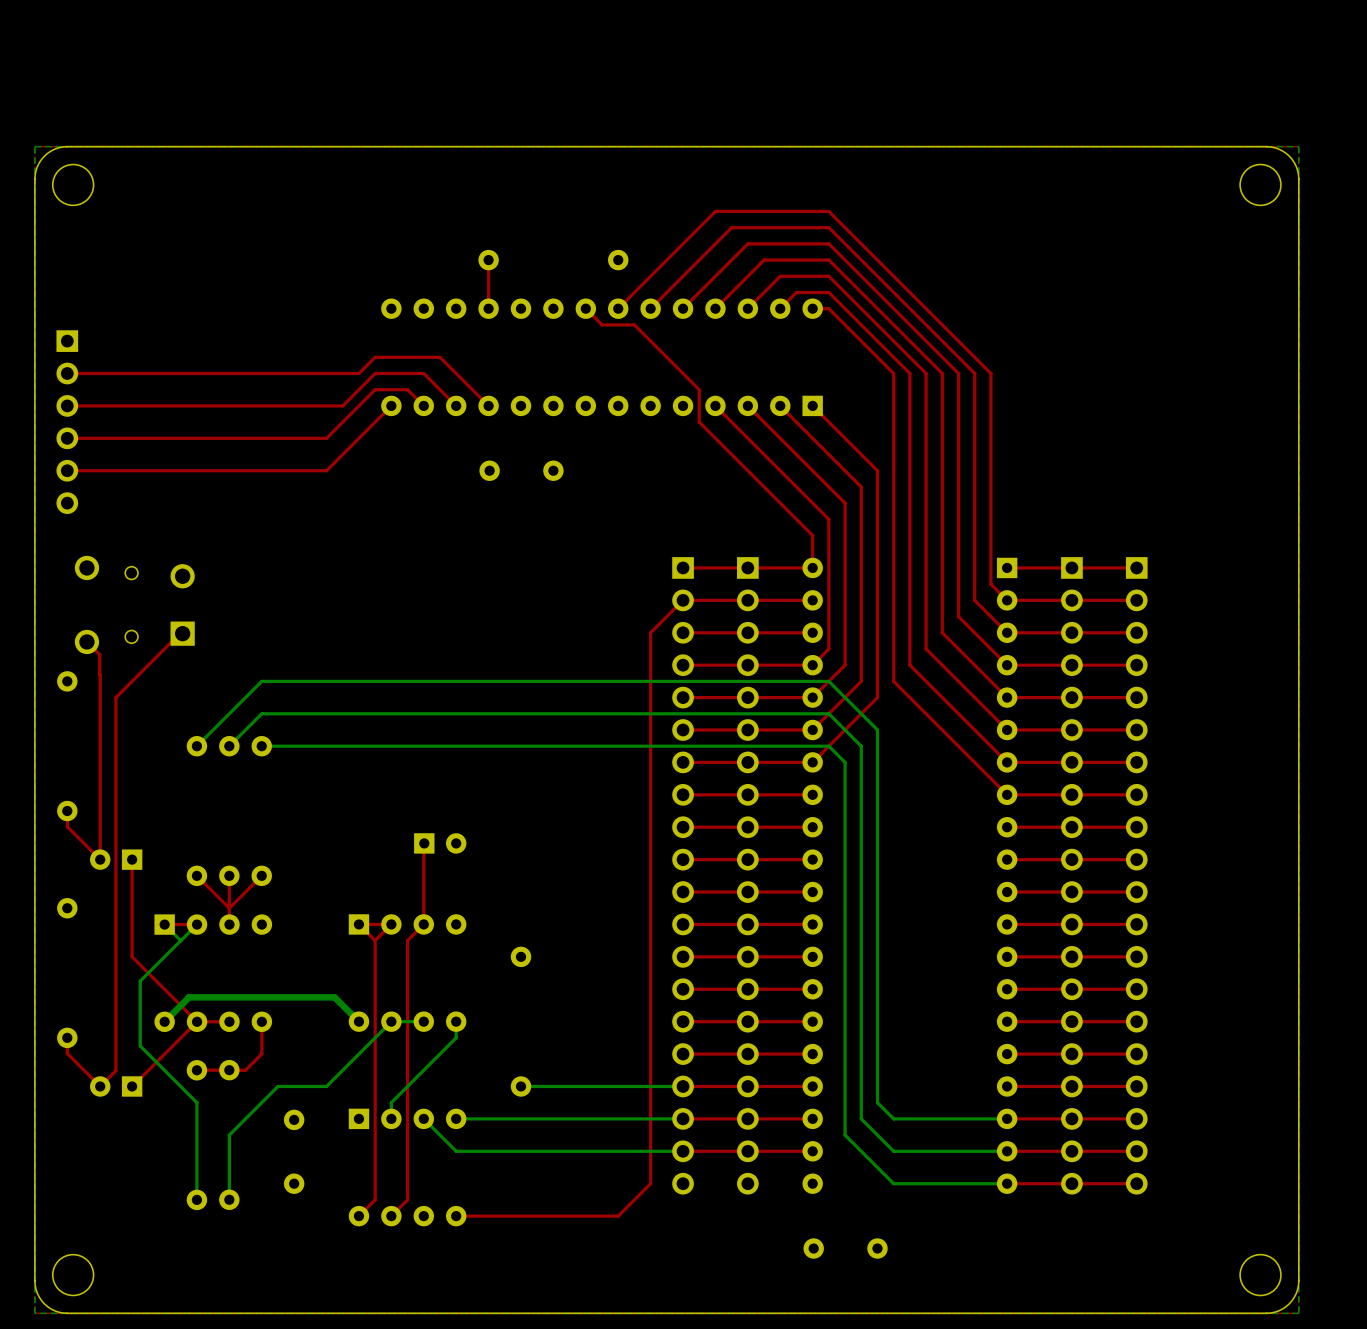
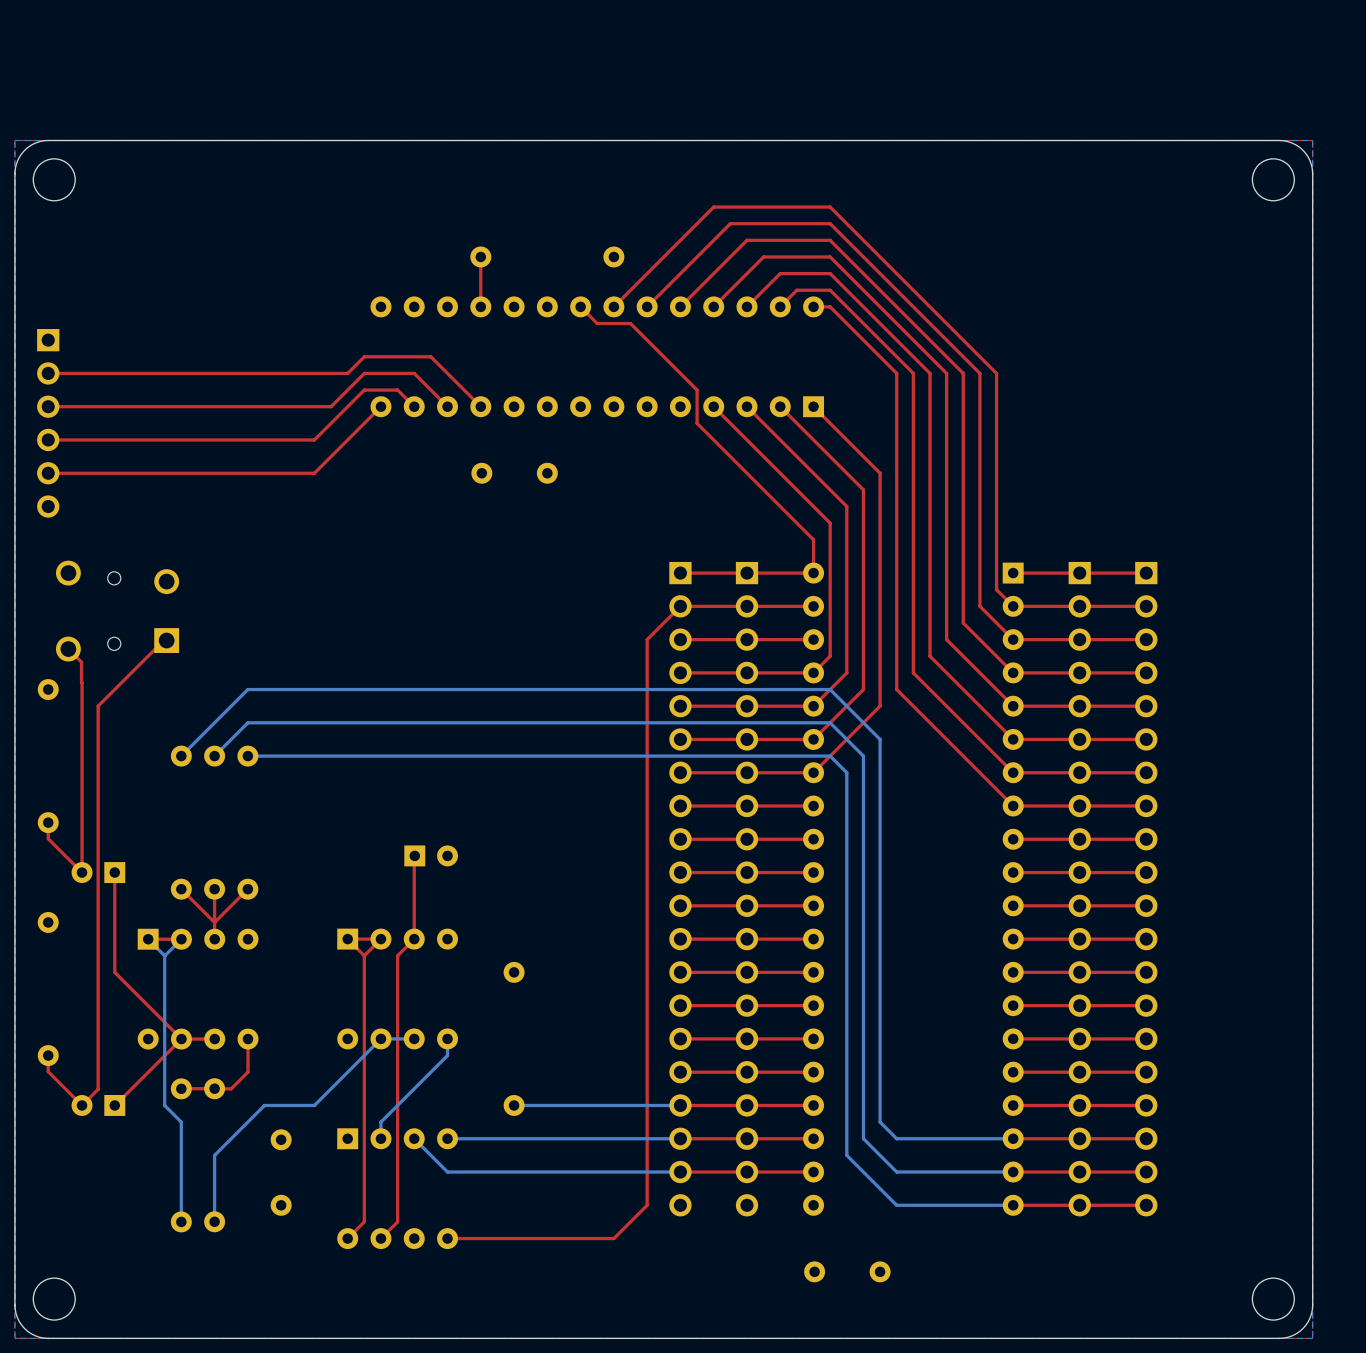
bottom track: (180, 940) (140, 981) (140, 1045) (180, 1086) -> (164, 955) (164, 1105)
bottom track: (358, 1021) (334, 997) (188, 997) (164, 1021) -> none

